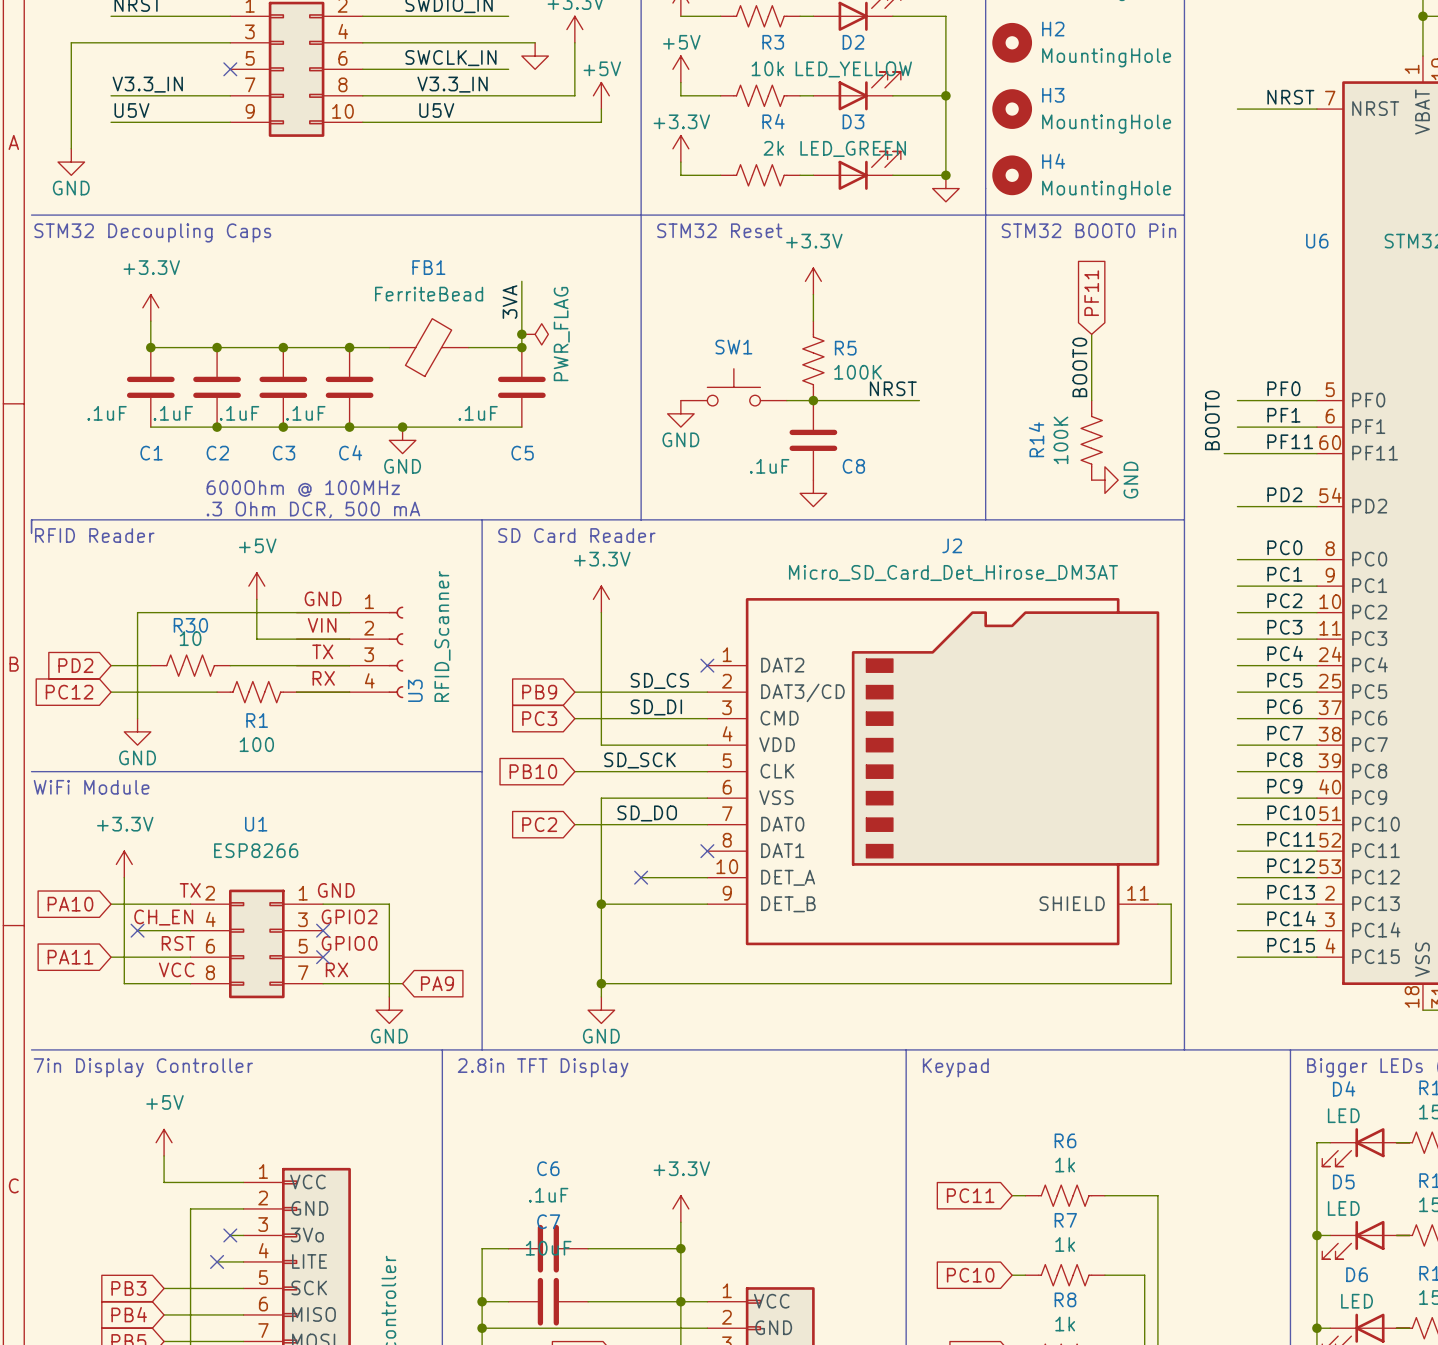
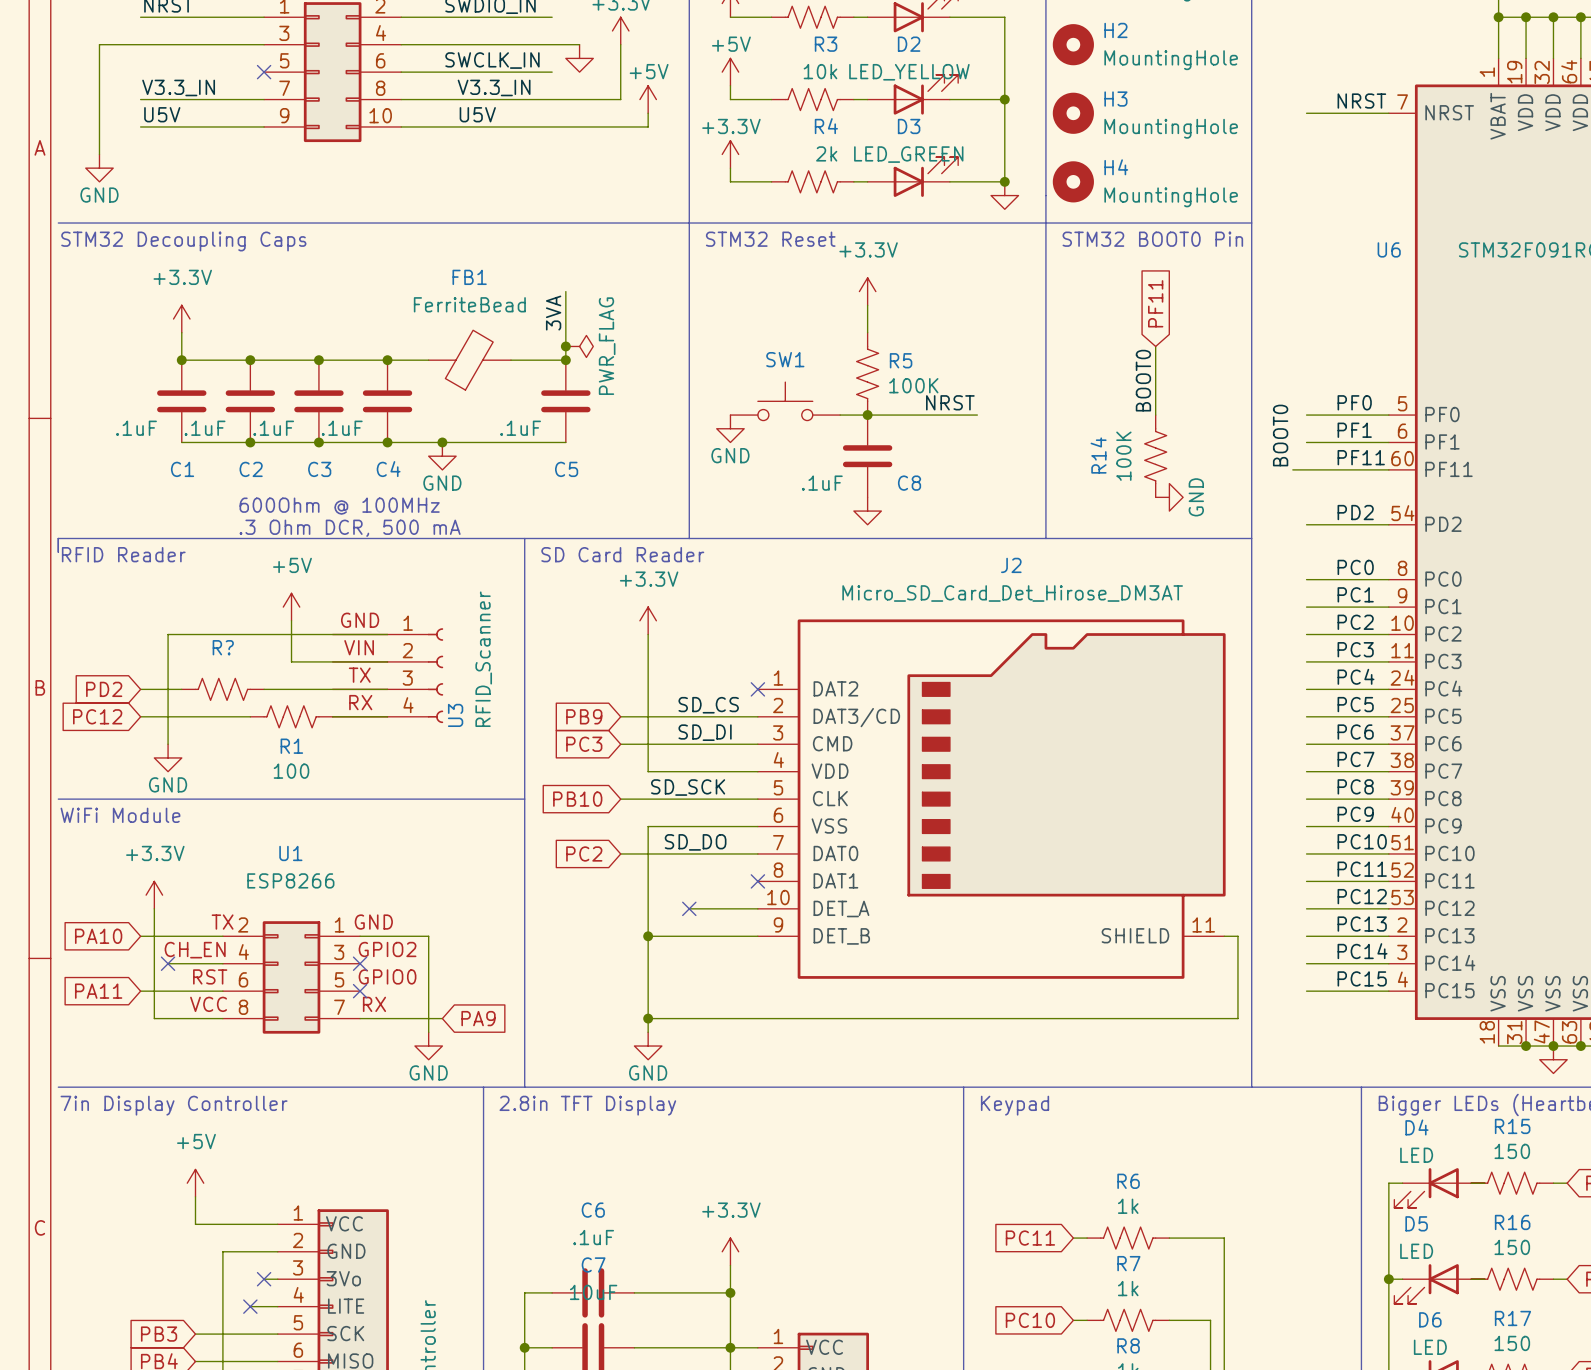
R30 name: R30 (190, 625) -> R? (223, 647)
R30 value: 10 (190, 638) -> none

